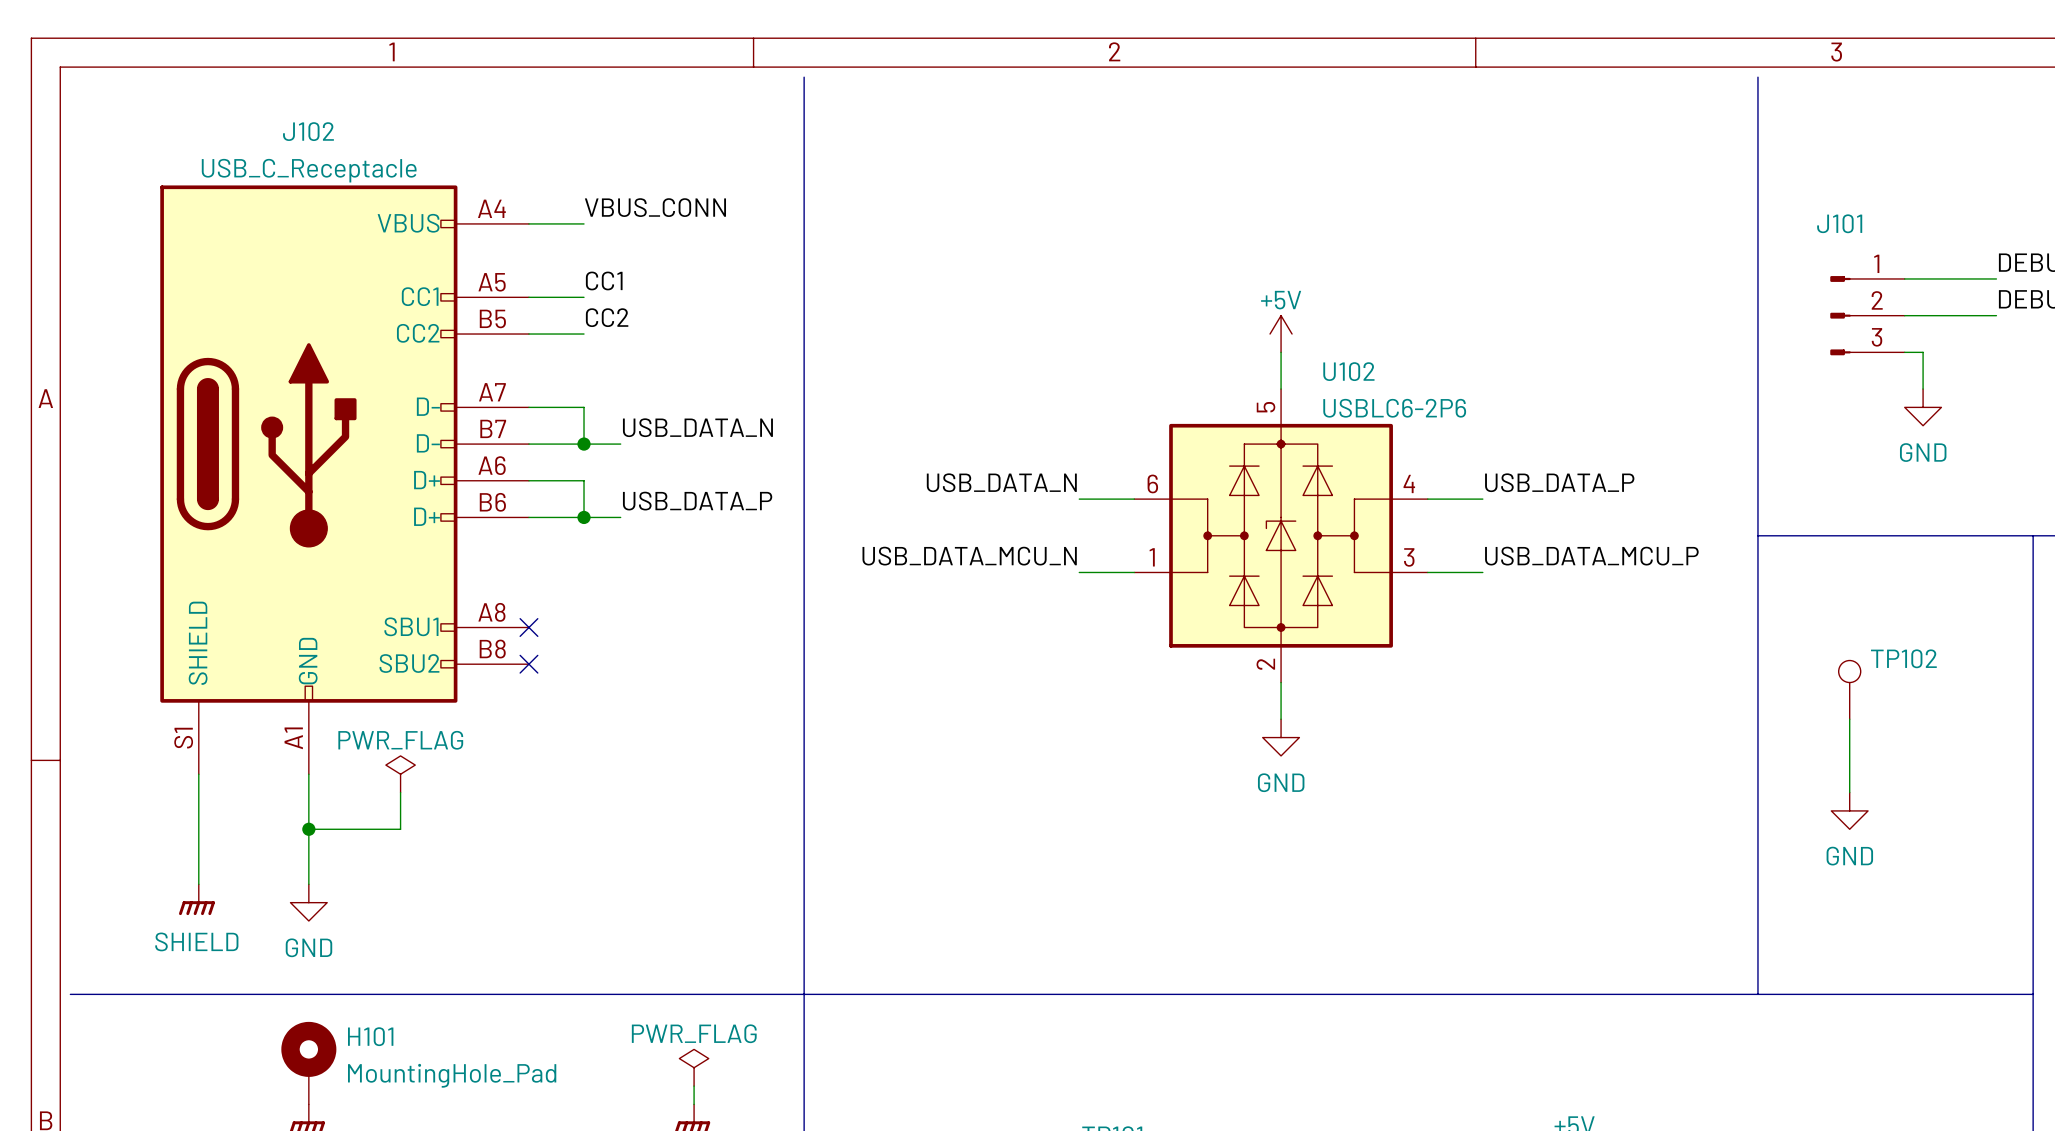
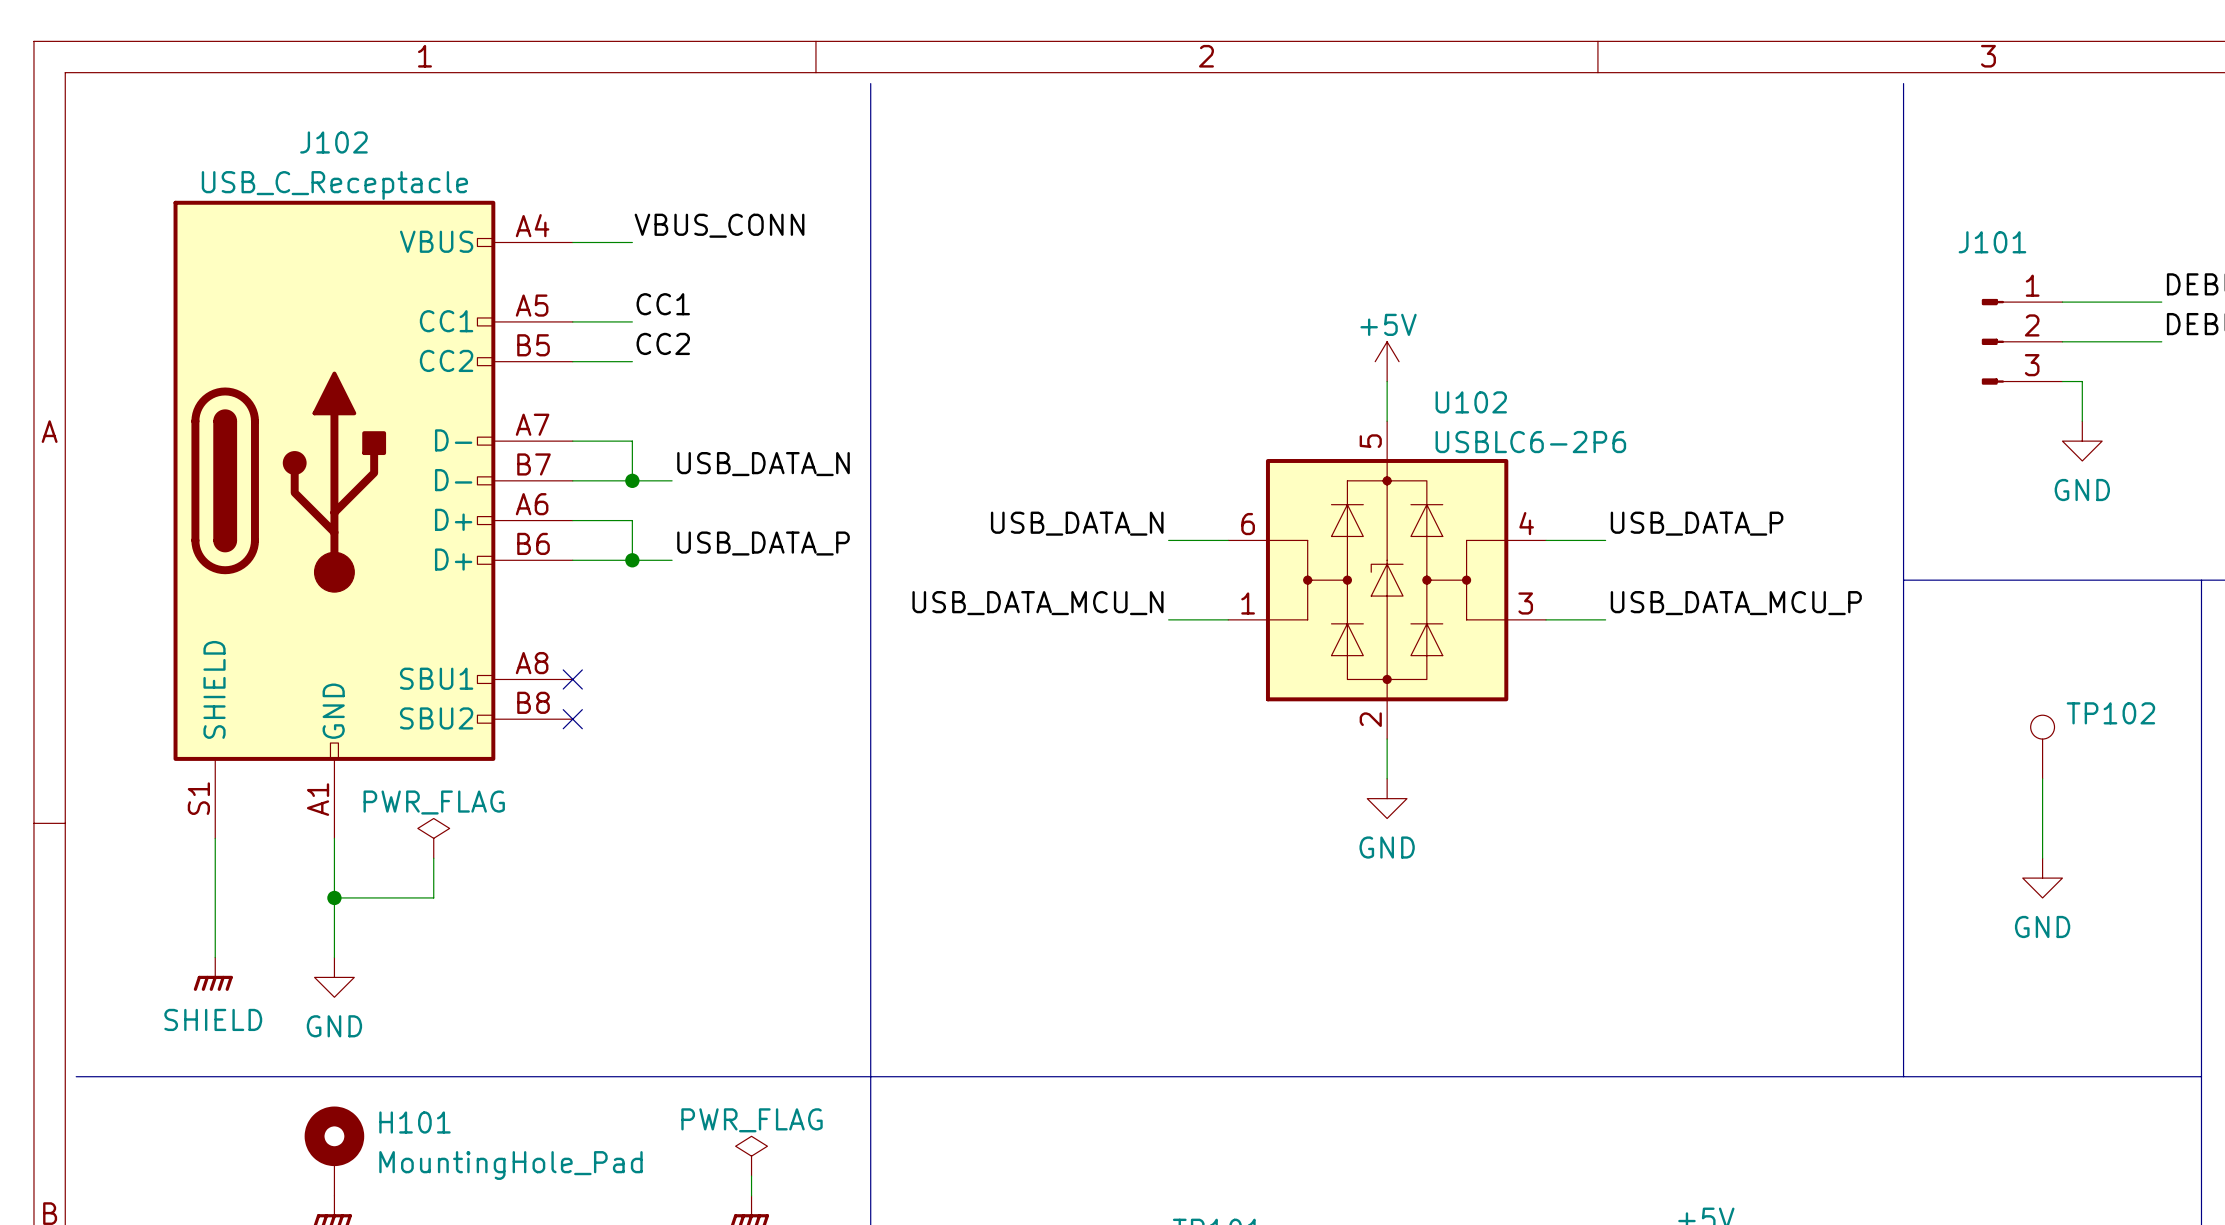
TP102 position: (1849, 689) -> (2042, 747)
wire: (1849, 719) (1849, 792) -> (2042, 778) (2042, 858)
power symbol position: GND (1849, 810) -> GND (2042, 878)

